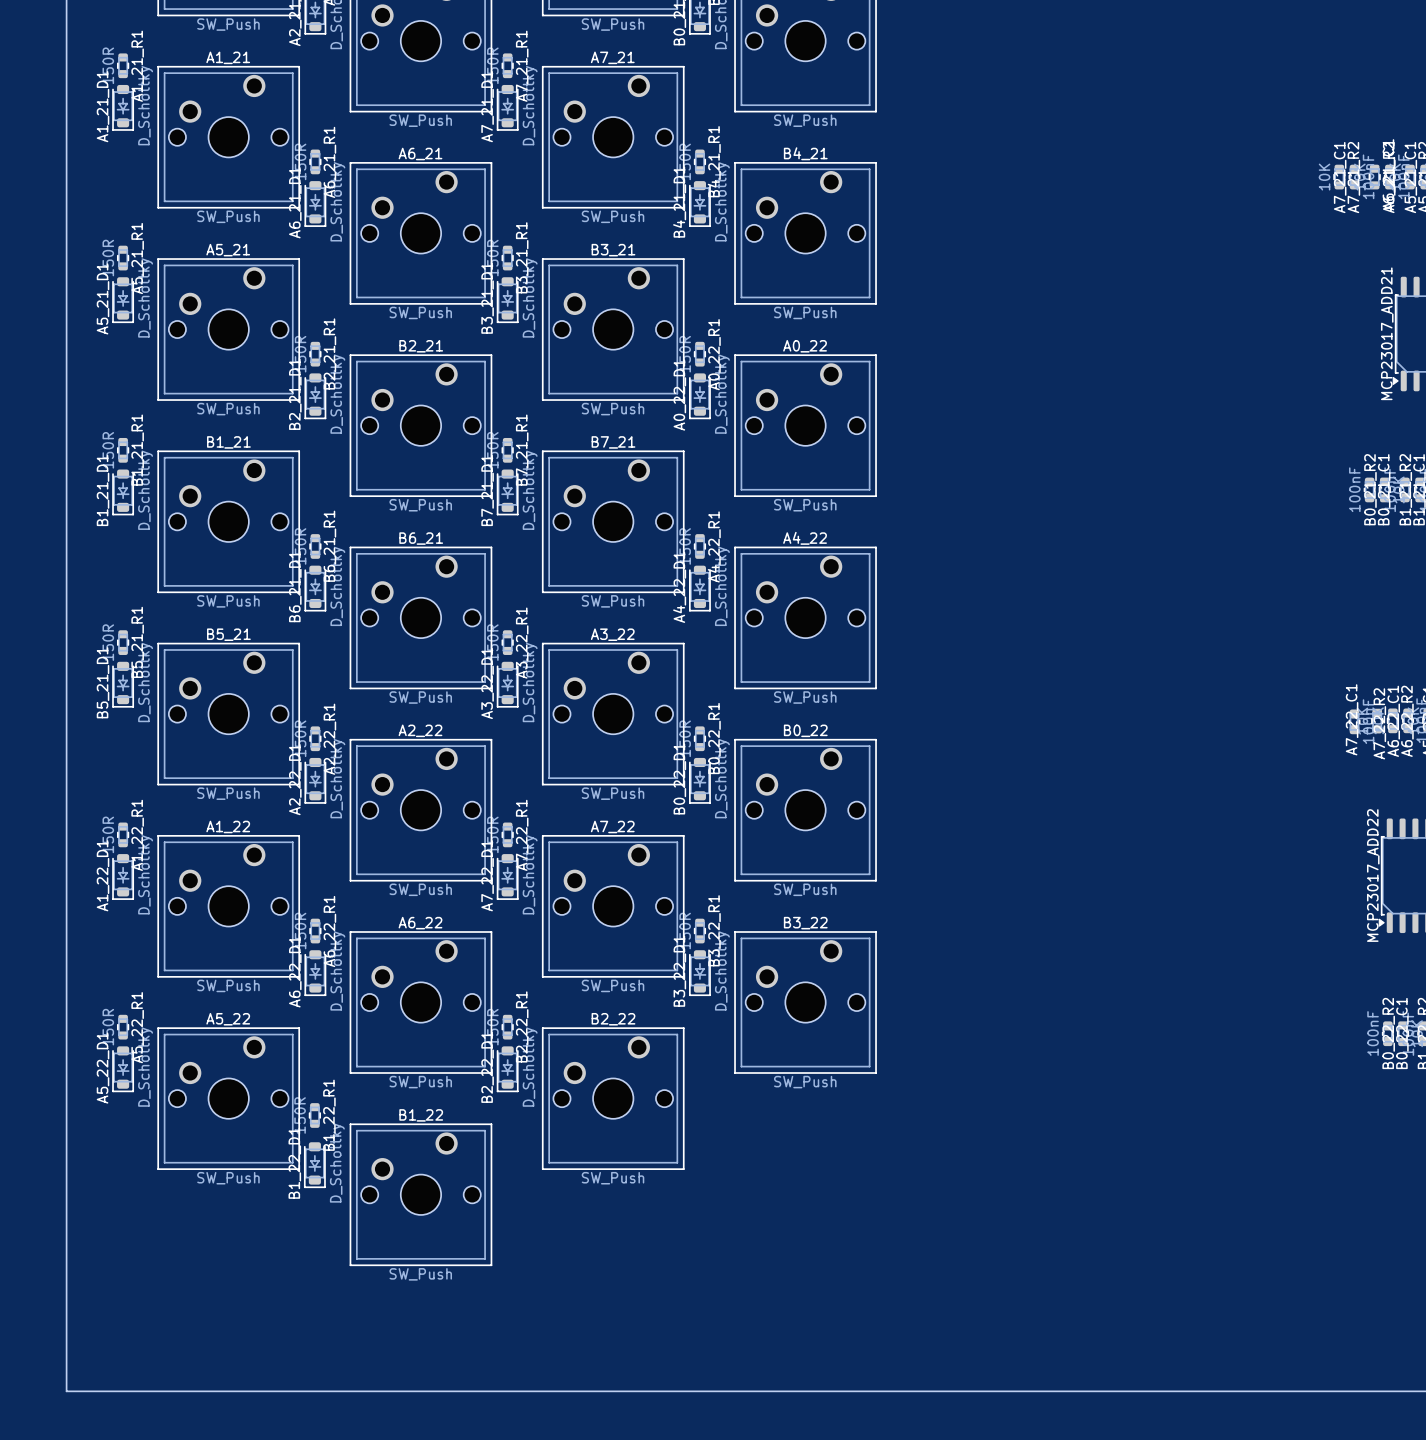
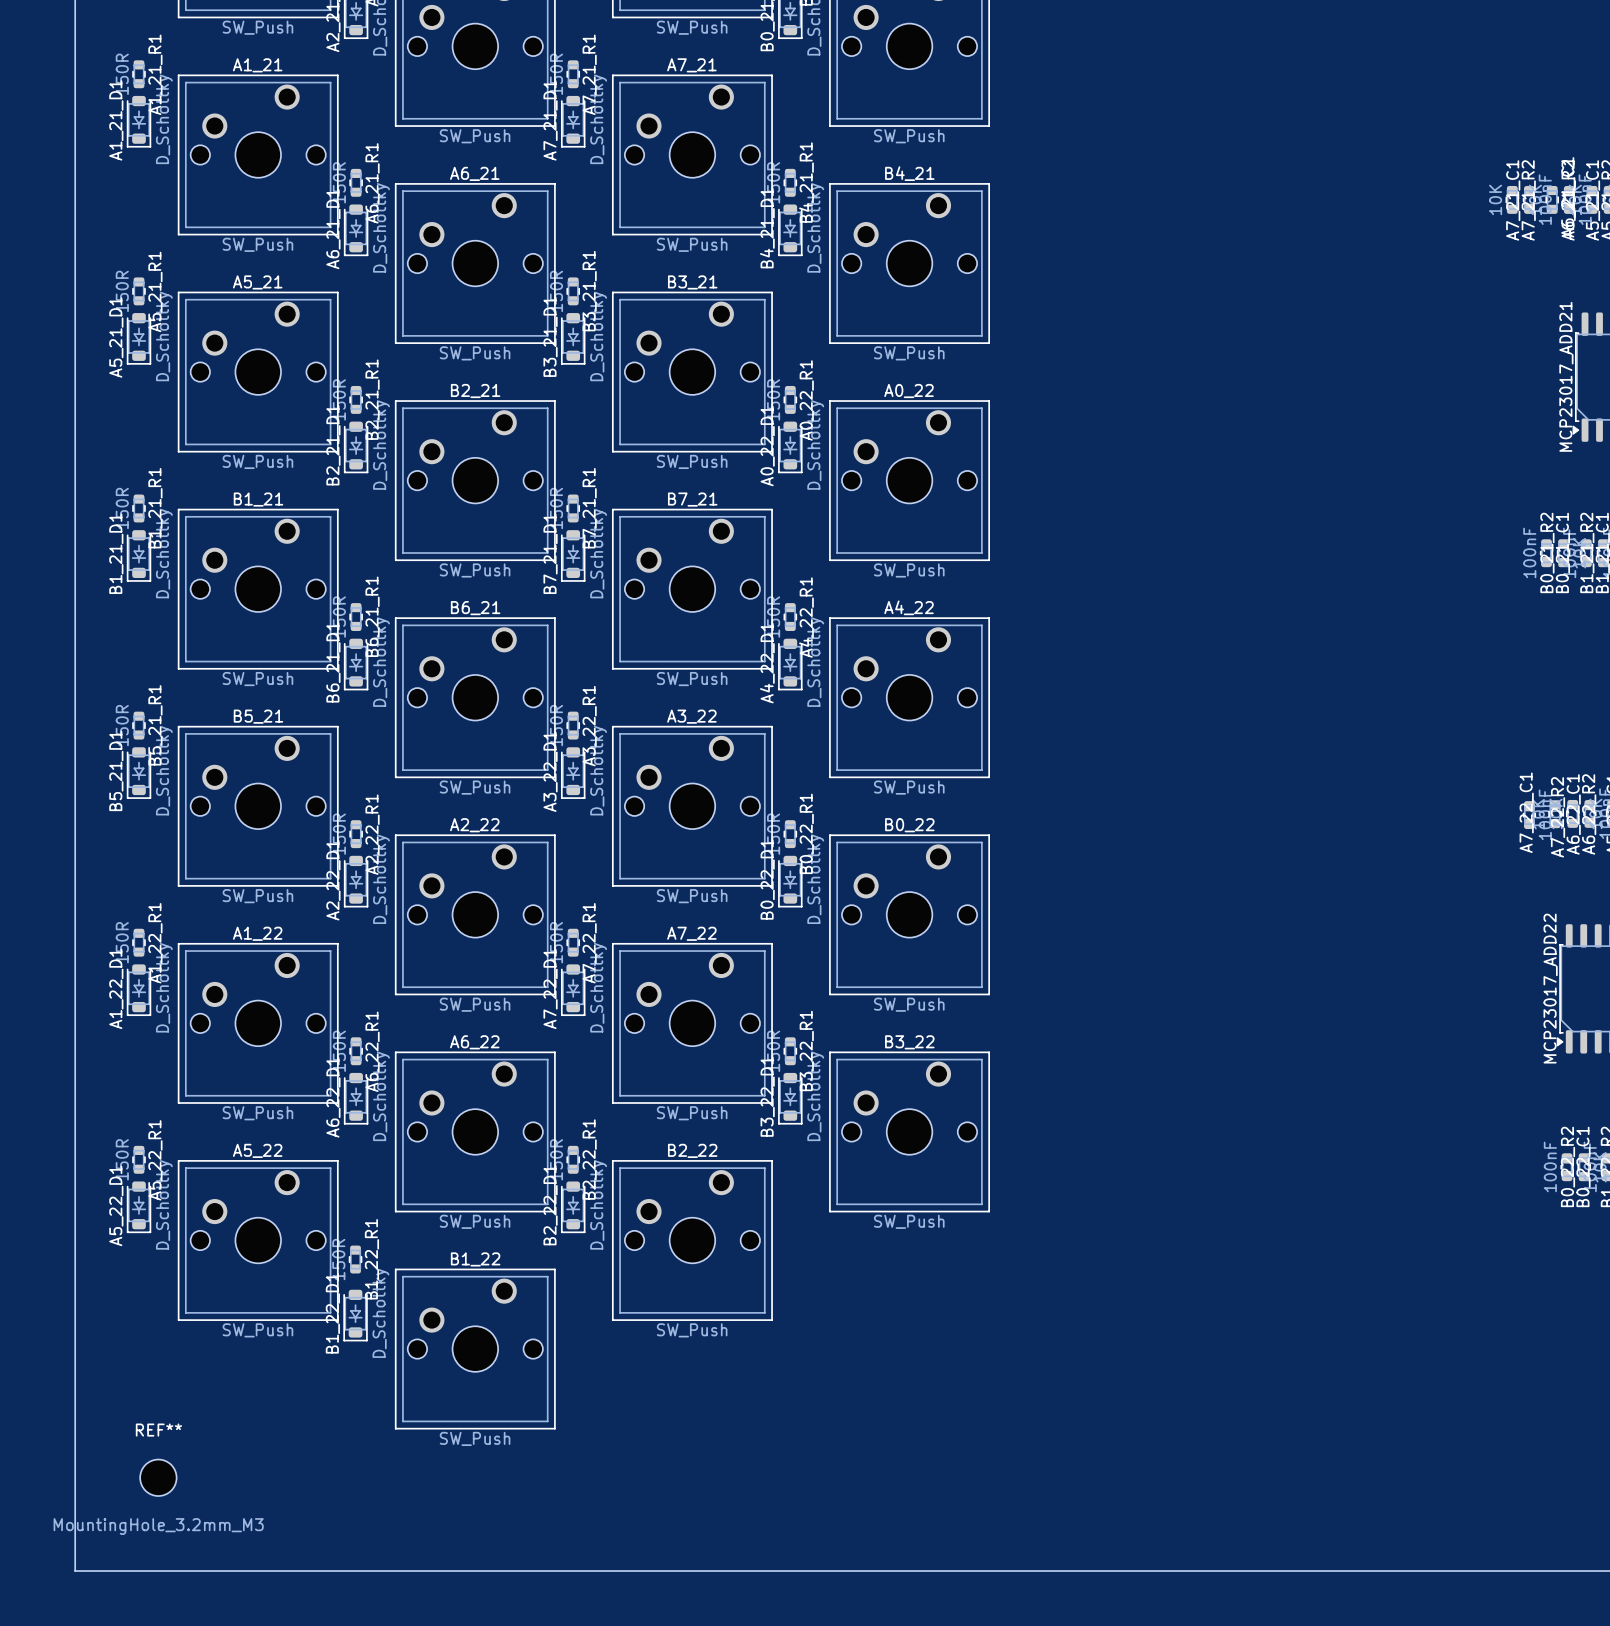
REF**: none -> MountingHole_3.2mm_M3 (158, 1477)

